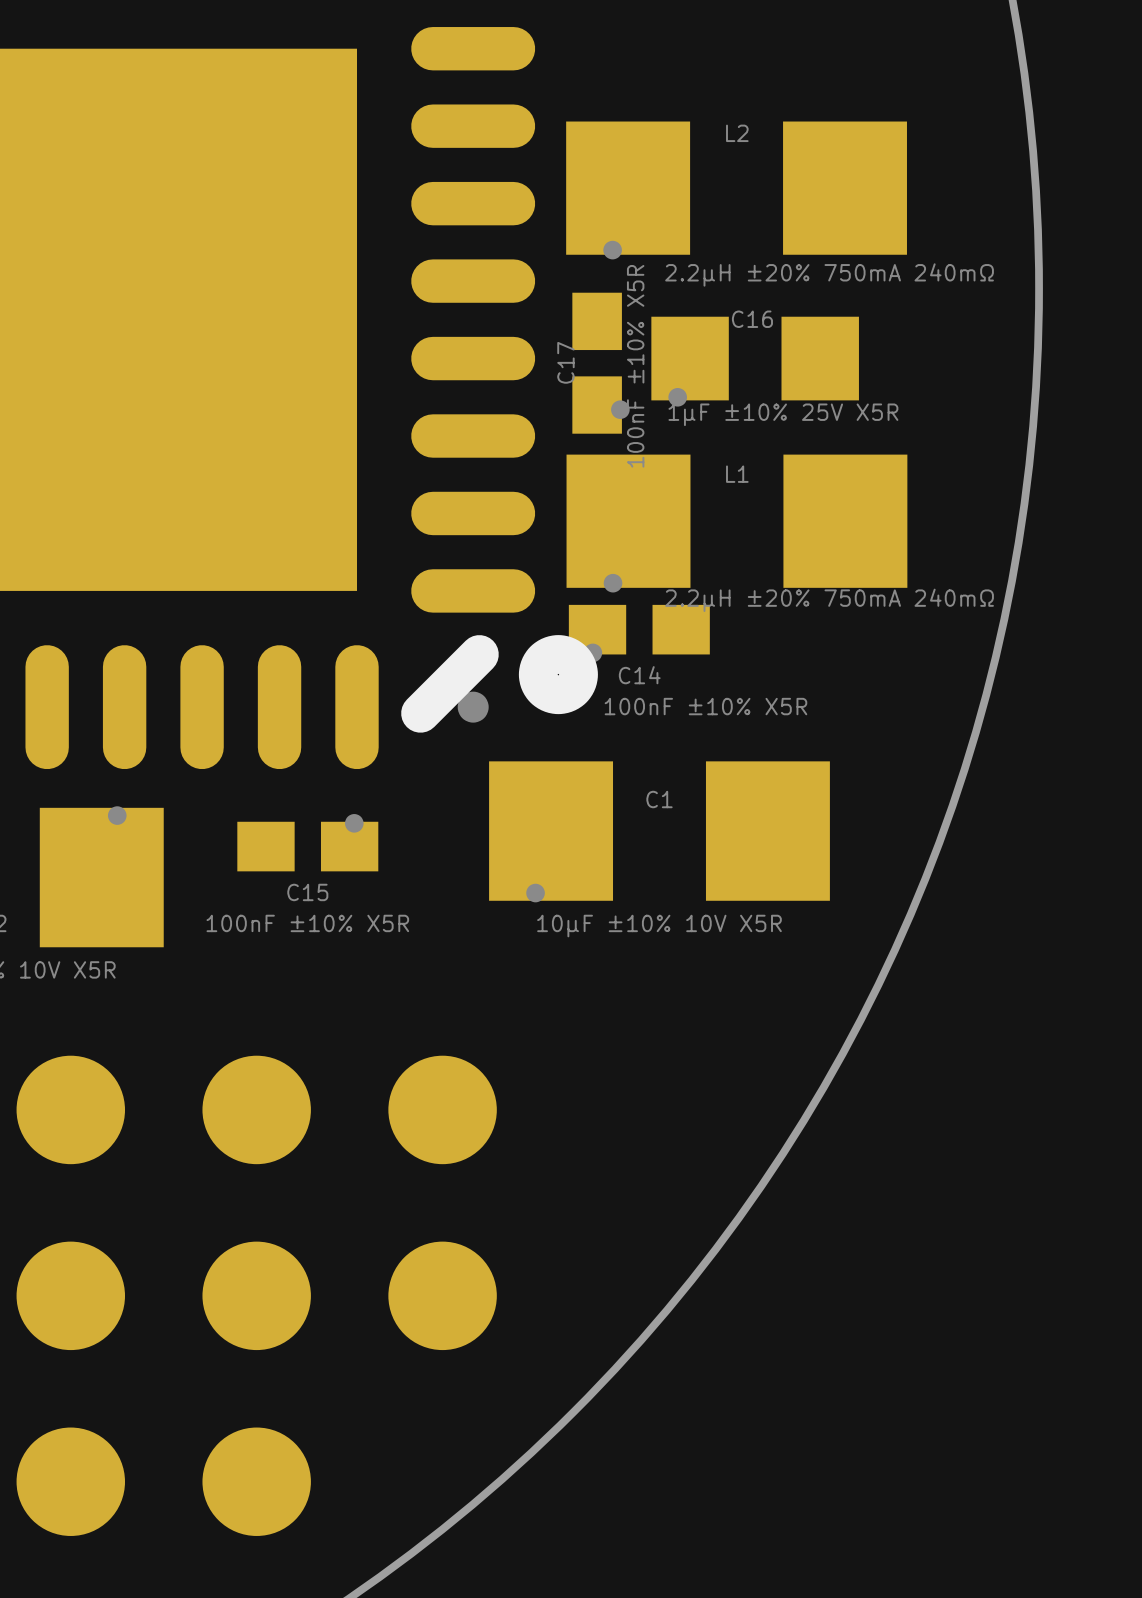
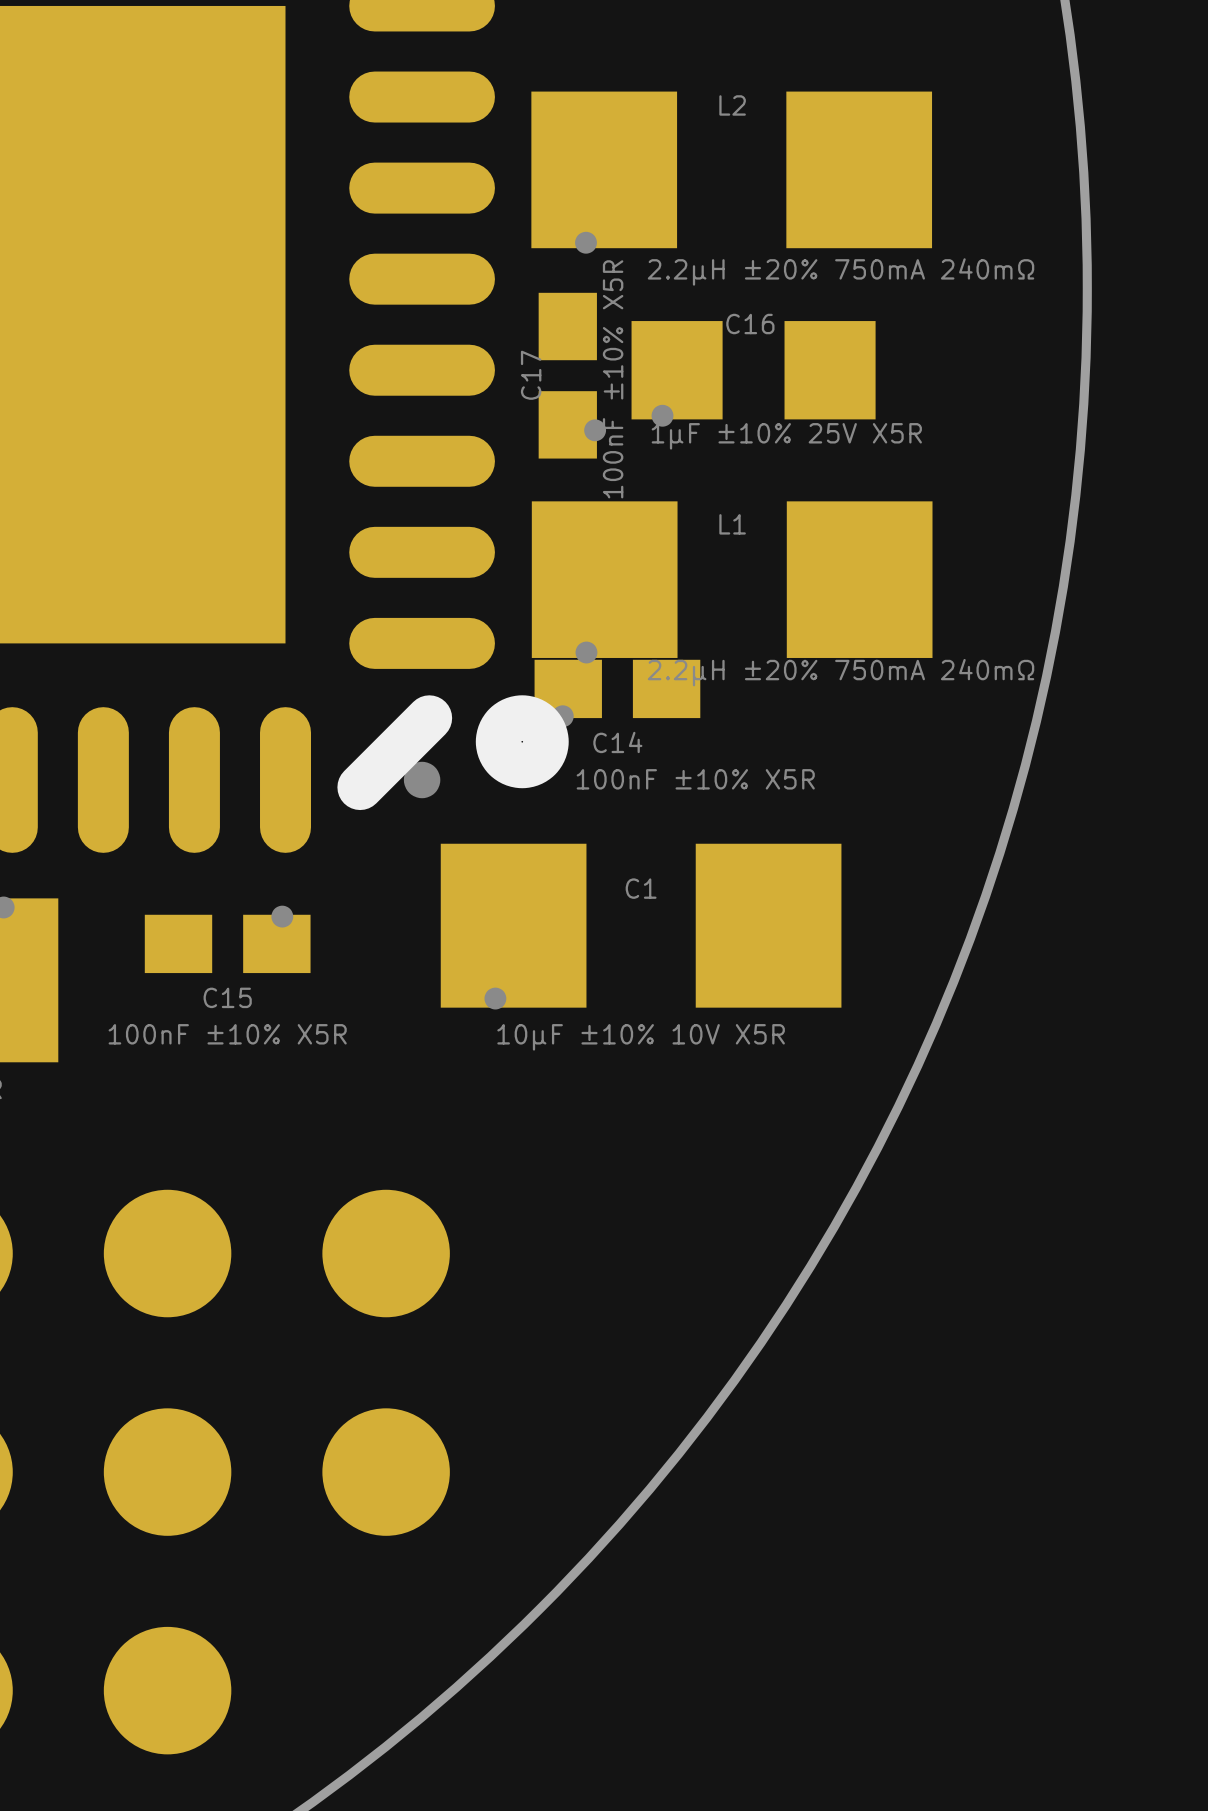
L1 position: (736, 523) -> (732, 582)

